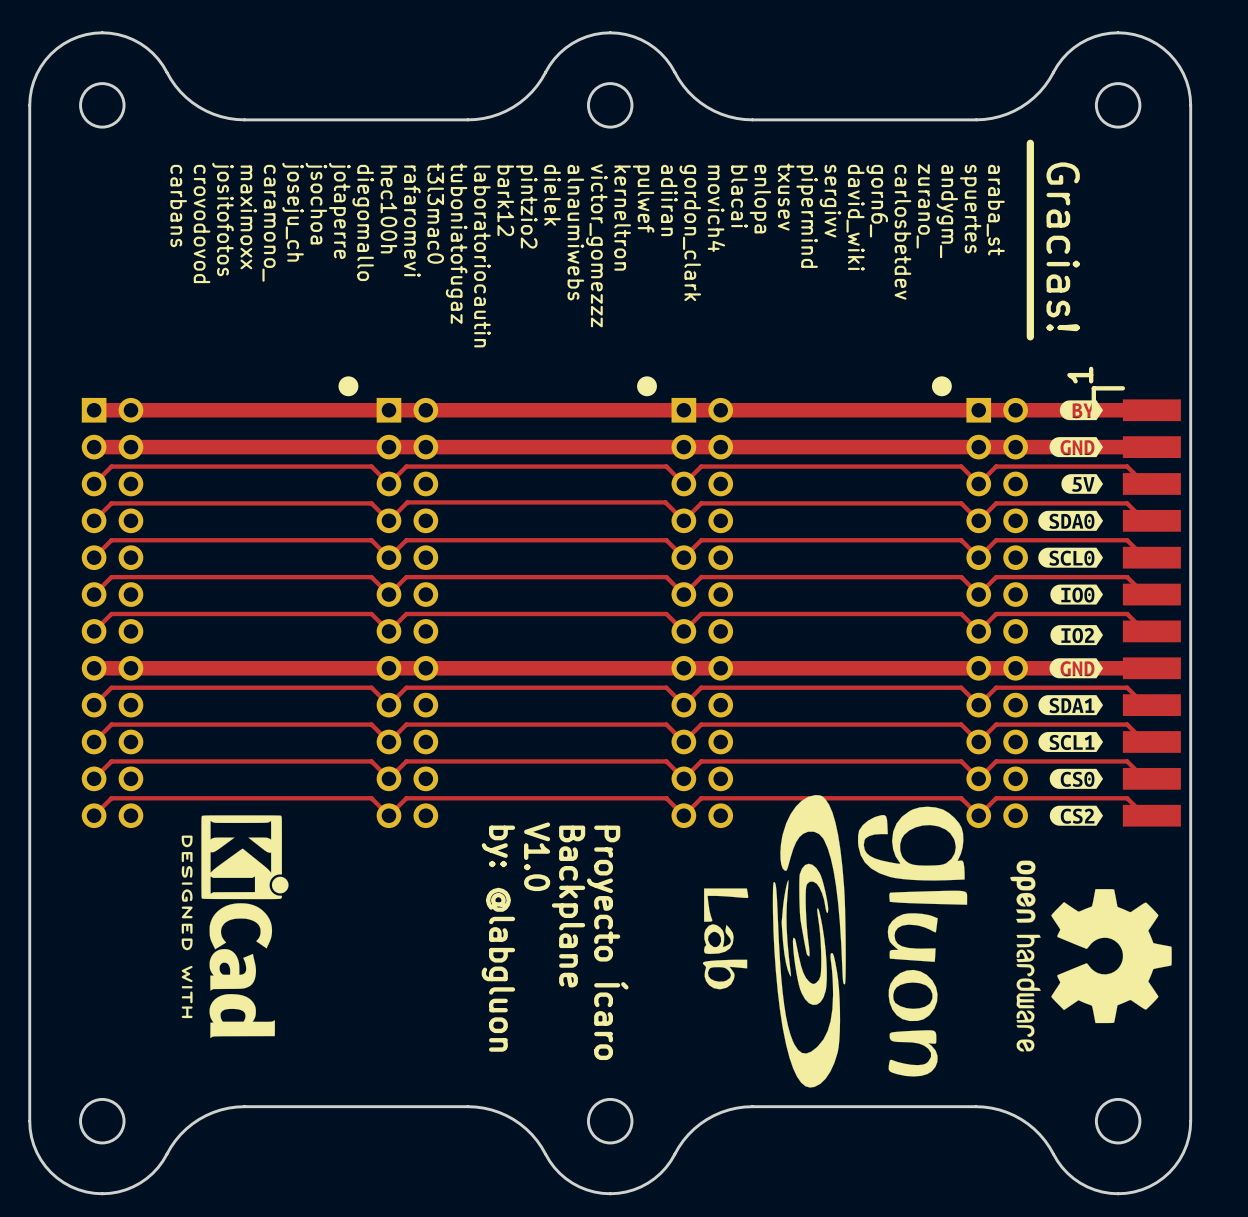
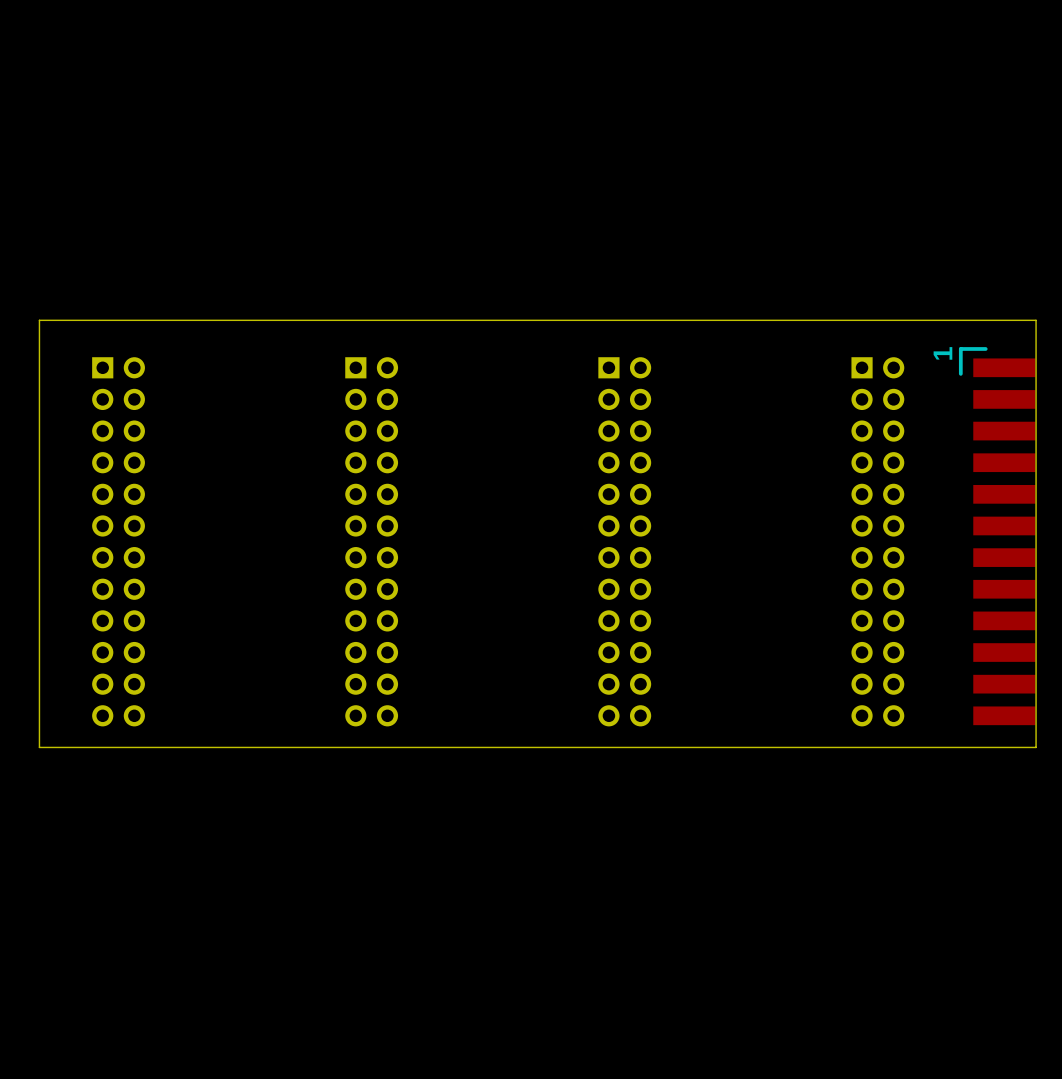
board edge: (102, 32) (78, 36) (63, 43) (50, 54) (40, 66) (33, 81) (29, 105) (29, 1121) (33, 1145) (40, 1159) (50, 1172) (63, 1182) (86, 1191) (102, 1193) (125, 1189) (140, 1183) (152, 1173) (175, 1140) (192, 1123) (213, 1112) (244, 1106) (468, 1106) (491, 1109) (506, 1115) (526, 1129) (537, 1140) (554, 1167) (565, 1178) (579, 1186) (602, 1193) (626, 1192) (648, 1183) (666, 1167) (683, 1140) (700, 1123) (728, 1109) (752, 1106) (991, 1108) (1007, 1112) (1028, 1123) (1045, 1140) (1067, 1173) (1080, 1183) (1094, 1189) (1118, 1193) (1134, 1191) (1156, 1182) (1169, 1172) (1179, 1159) (1186, 1145) (1190, 1121) (1190, 105) (1186, 81) (1179, 66) (1169, 54) (1156, 43) (1134, 34) (1118, 32) (1094, 36) (1080, 43) (1067, 53) (1045, 85) (1028, 102) (1007, 114) (992, 118) (752, 119) (721, 114) (700, 102) (683, 85) (666, 59) (648, 43) (626, 34) (602, 33) (579, 39) (565, 48) (554, 59) (537, 85) (526, 97) (513, 107) (491, 116) (467, 119) (244, 119) (220, 116) (199, 107) (180, 91) (158, 59) (146, 48) (125, 36) (102, 32) -> none
round board edge: [79, 82, 126, 129] -> none
round board edge: [587, 82, 634, 129] -> none
round board edge: [1094, 82, 1142, 129] -> none
line: (1030, 143) (1030, 336) -> none
text: dielek (552, 195) -> none
text: blacai (739, 196) -> none
text: txusev (786, 197) -> none
text: pulwef (643, 199) -> none
text: enlopa (760, 199) -> none
text: bark12 (505, 200) -> none
text: adiiran (669, 200) -> none
text: sergivv (830, 201) -> none
text: gorn6_ (877, 201) -> none
text: jsochoa (316, 203) -> none
text: carbans (178, 206) -> none
text: zurano_ (923, 206) -> none
text: pintzio2 (526, 207) -> none
text: movich4 (716, 208) -> none
text: hec100h (388, 209) -> none
text: spuertes (970, 209) -> none
text: jotaperre (339, 210) -> none
text: araba_st (995, 210) -> none
text: andygm_ (947, 211) -> none
text: joseju_ch (293, 212) -> none
text: t3l3mac0 (435, 213) -> none
text: pipermind (807, 216) -> none
text: maximoxx (248, 217) -> none
text: david_wiki (855, 217) -> none
text: kerneltron (622, 218) -> none
text: jositofotos (223, 219) -> none
text: rafaromevi (412, 221) -> none
text: diegomallo (363, 222) -> none
text: crovodovod (202, 223) -> none
text: caramono_ (269, 223) -> none
text: alnaumiwebs (575, 232) -> none
text: gordon_clark (690, 232) -> none
text: carlosbetdev (902, 232) -> none
text: tuboniatofugaz (456, 243) -> none
text: victor_gomezzz (596, 245) -> none
text: Gracias! (1063, 246) -> none
text: laboratoriocautin (482, 256) -> none
board edge: none -> (39, 320) (1036, 320) (1036, 747) (39, 747) (39, 320)
drawing: [338, 376, 359, 397] -> none
drawing: [637, 376, 657, 397] -> none
drawing: [931, 376, 952, 397] -> none
part footprint: [1091, 386, 1181, 827] -> [958, 347, 1036, 726]
drawing: [1038, 400, 1104, 605] -> none
track: (94, 410) (1144, 410) -> none
track: (94, 447) (1144, 447) -> none
track: (94, 483) (111, 466) (371, 466) (388, 483) (406, 466) (666, 466) (683, 483) (701, 466) (961, 466) (978, 483) (996, 466) (1127, 466) (1144, 483) -> none
track: (94, 520) (111, 503) (371, 503) (388, 520) (407, 502) (665, 502) (683, 520) (701, 503) (961, 503) (978, 520) (996, 503) (1127, 503) (1144, 520) -> none
track: (94, 557) (111, 540) (371, 540) (388, 557) (406, 540) (666, 540) (683, 557) (701, 540) (961, 540) (978, 557) (996, 540) (1127, 540) (1144, 557) -> none
track: (94, 594) (111, 577) (371, 577) (388, 594) (406, 577) (666, 577) (683, 594) (701, 577) (961, 577) (978, 594) (996, 577) (1127, 577) (1144, 594) -> none
drawing: [1038, 625, 1104, 826] -> none
track: (94, 631) (111, 613) (371, 613) (388, 631) (406, 613) (666, 613) (683, 631) (701, 613) (961, 613) (978, 631) (996, 613) (1127, 613) (1144, 631) -> none
track: (94, 668) (1144, 668) -> none
track: (94, 705) (111, 687) (371, 687) (388, 705) (406, 687) (666, 687) (683, 705) (701, 687) (961, 687) (978, 705) (996, 687) (1127, 687) (1144, 705) -> none
track: (94, 741) (111, 724) (371, 724) (388, 741) (406, 724) (666, 724) (683, 741) (701, 724) (961, 724) (978, 741) (996, 724) (1127, 724) (1144, 741) -> none
track: (94, 778) (111, 761) (371, 761) (388, 778) (406, 761) (666, 761) (683, 778) (701, 761) (961, 761) (978, 778) (996, 761) (1127, 761) (1144, 778) -> none
drawing: [702, 795, 968, 1088] -> none
track: (94, 815) (111, 798) (371, 798) (388, 815) (406, 798) (666, 798) (683, 815) (701, 798) (961, 798) (978, 815) (996, 798) (1127, 798) (1144, 815) -> none
drawing: [181, 815, 289, 1039] -> none
text: V1.0 (537, 856) -> none
drawing: [1010, 860, 1172, 1052] -> none
text: Backplane (568, 906) -> none
text: by: @labgluon (498, 938) -> none
text: Proyecto Ícaro (607, 942) -> none
round board edge: [79, 1097, 126, 1145] -> none
round board edge: [587, 1097, 634, 1145] -> none
round board edge: [1094, 1097, 1142, 1145] -> none

